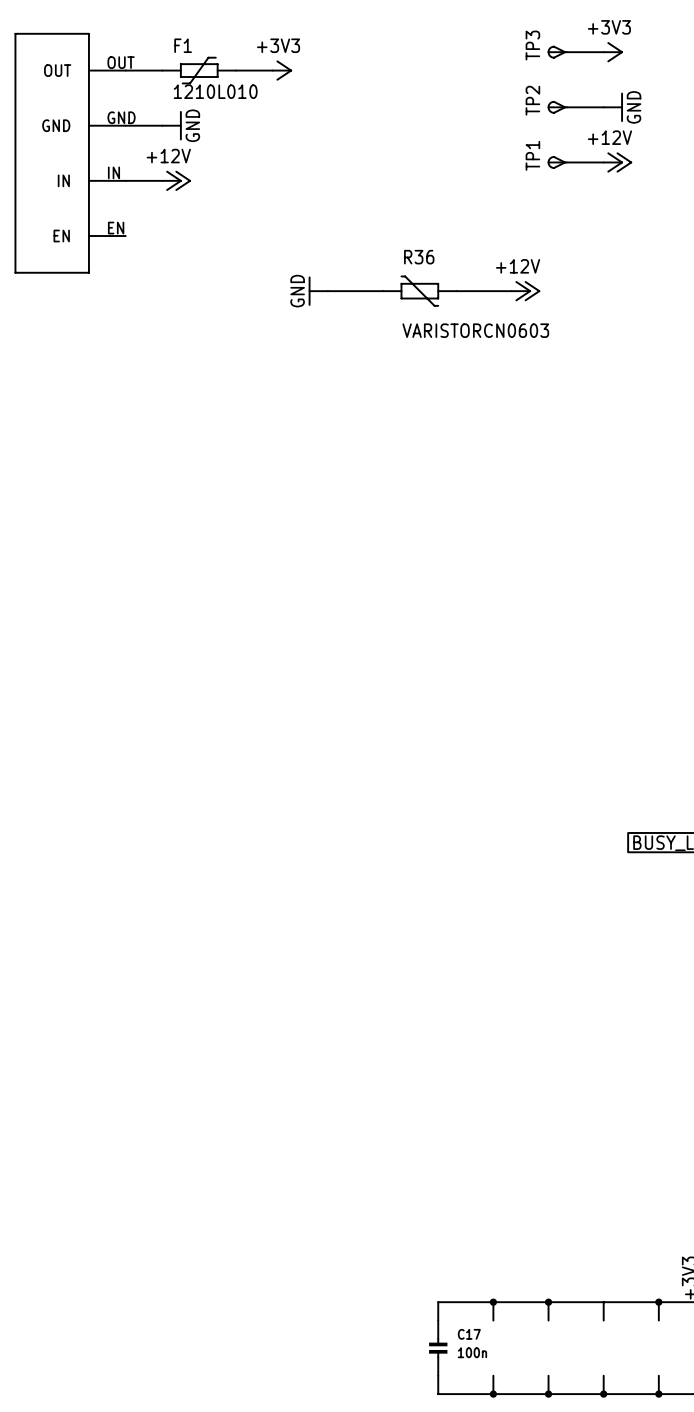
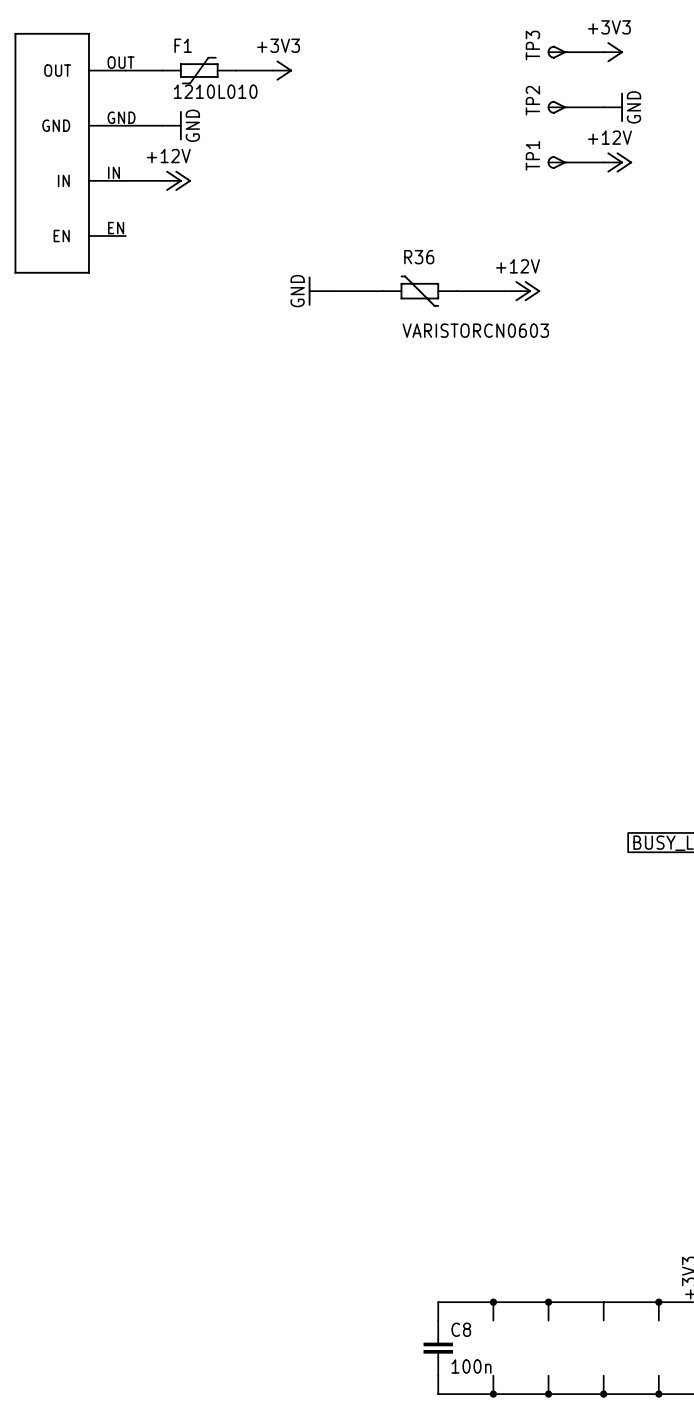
C17: 100n (438, 1348) -> none
C8: none -> 100n (438, 1348)

